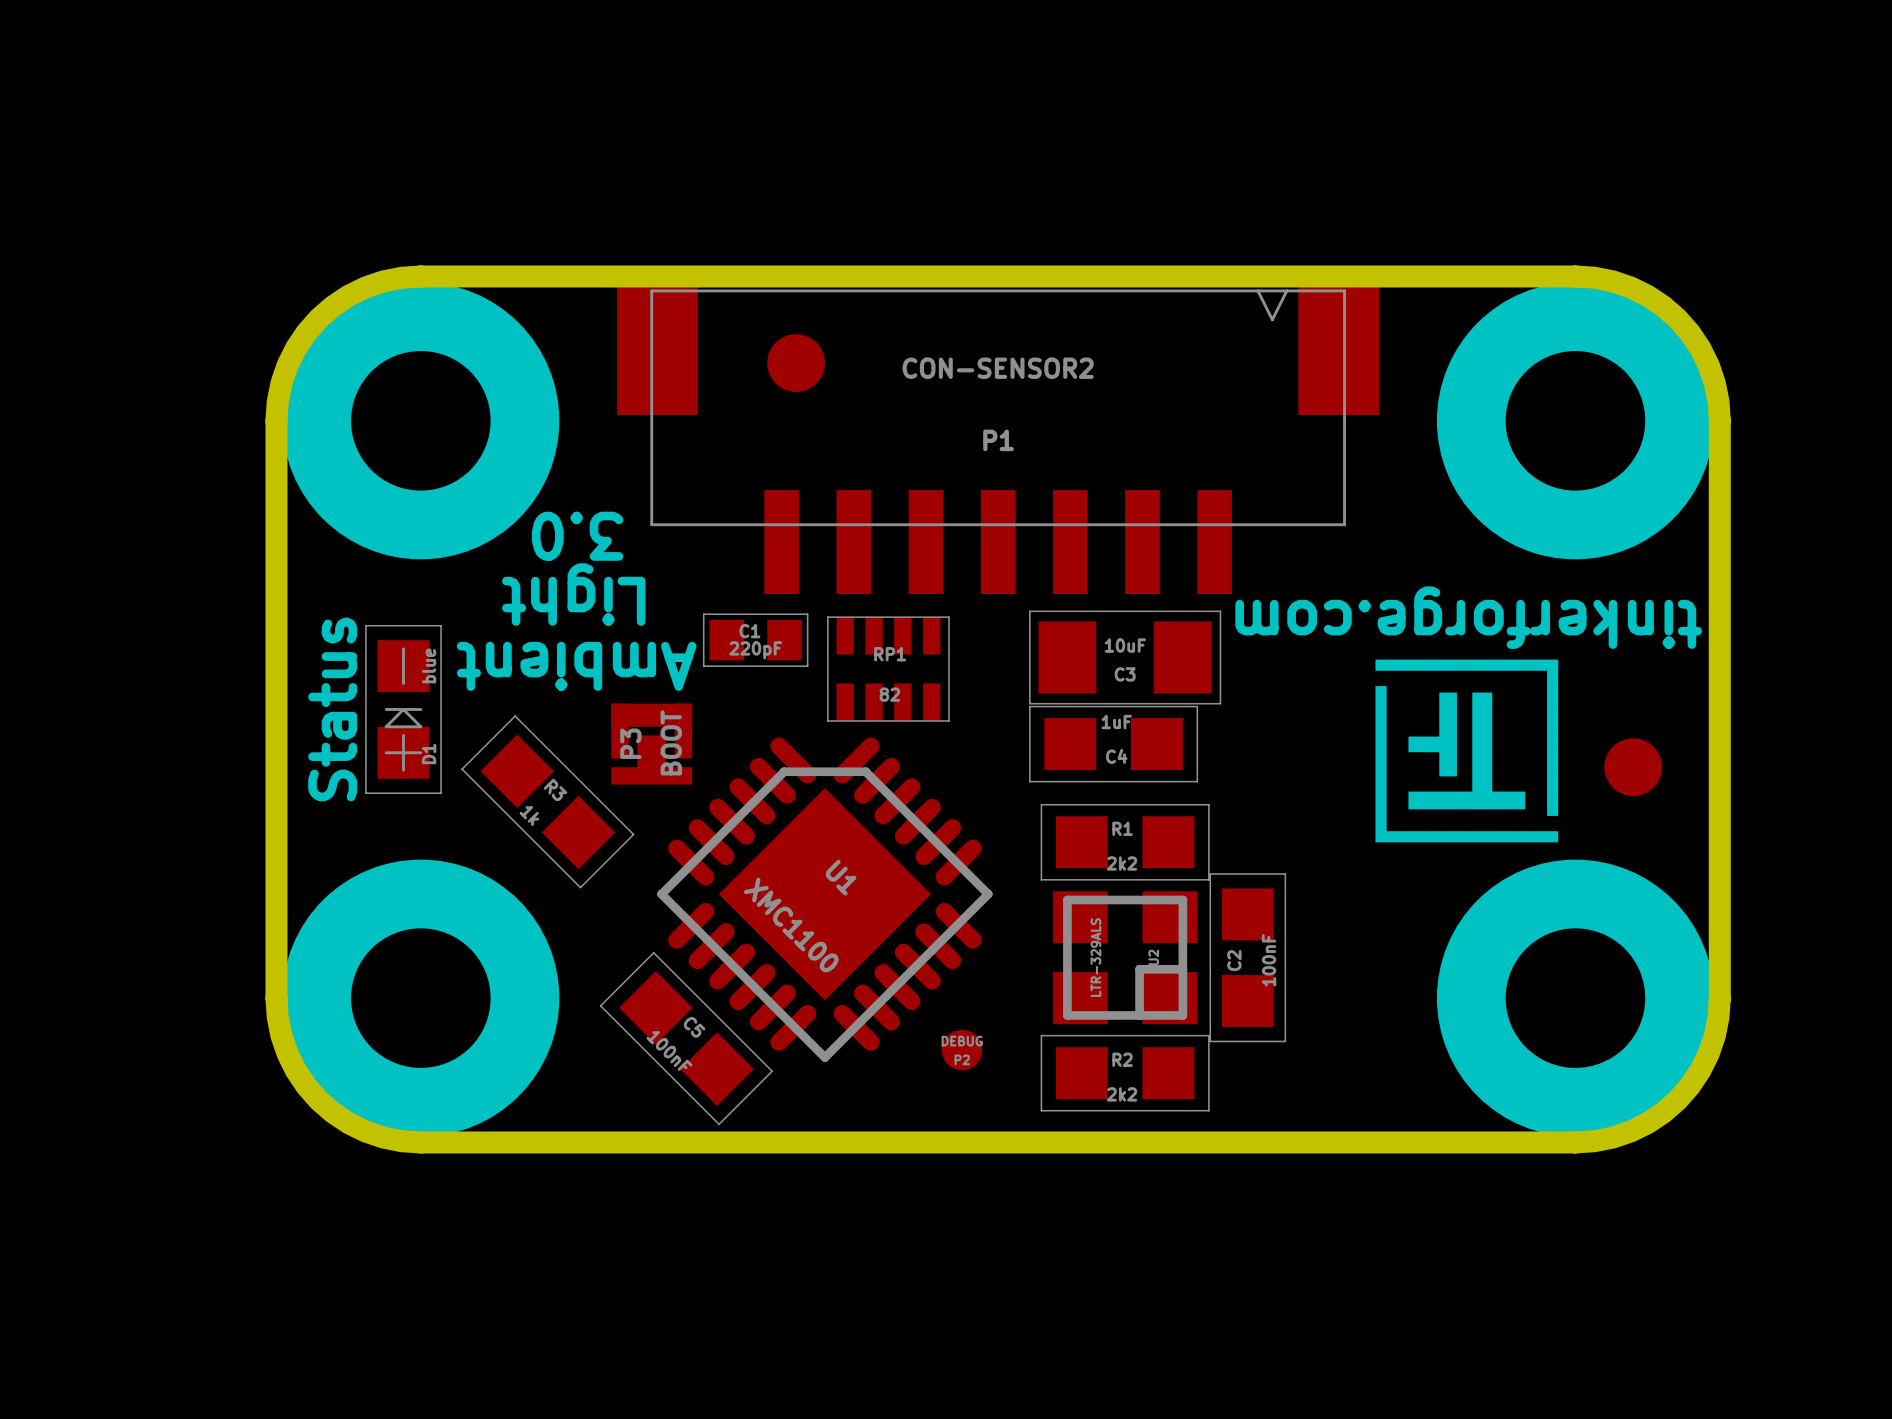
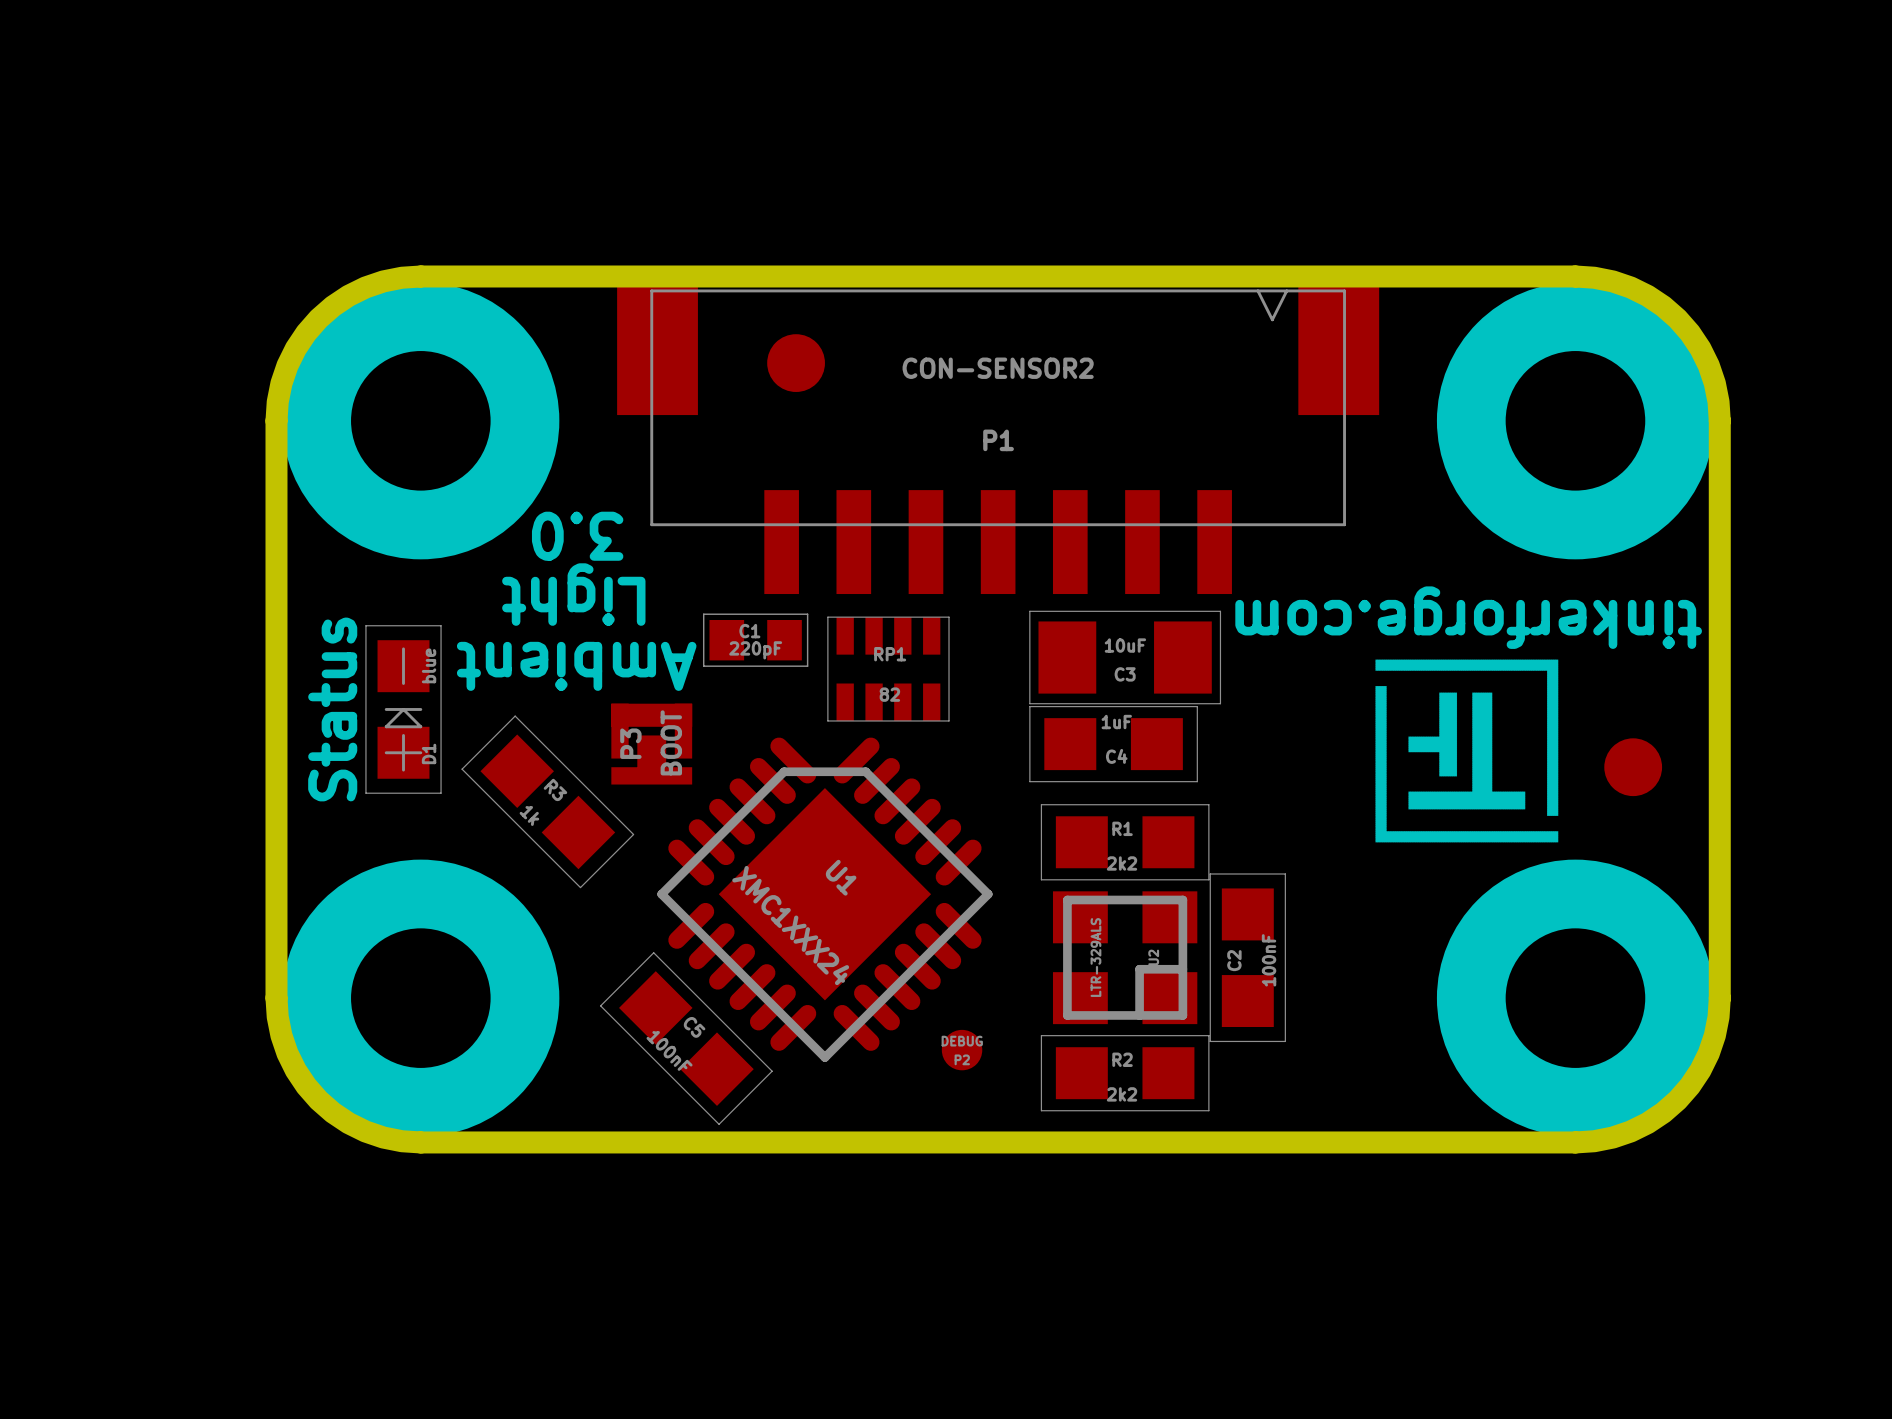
U1 value: XMC1100 (791, 924) -> XMC1XXX24 (790, 925)

